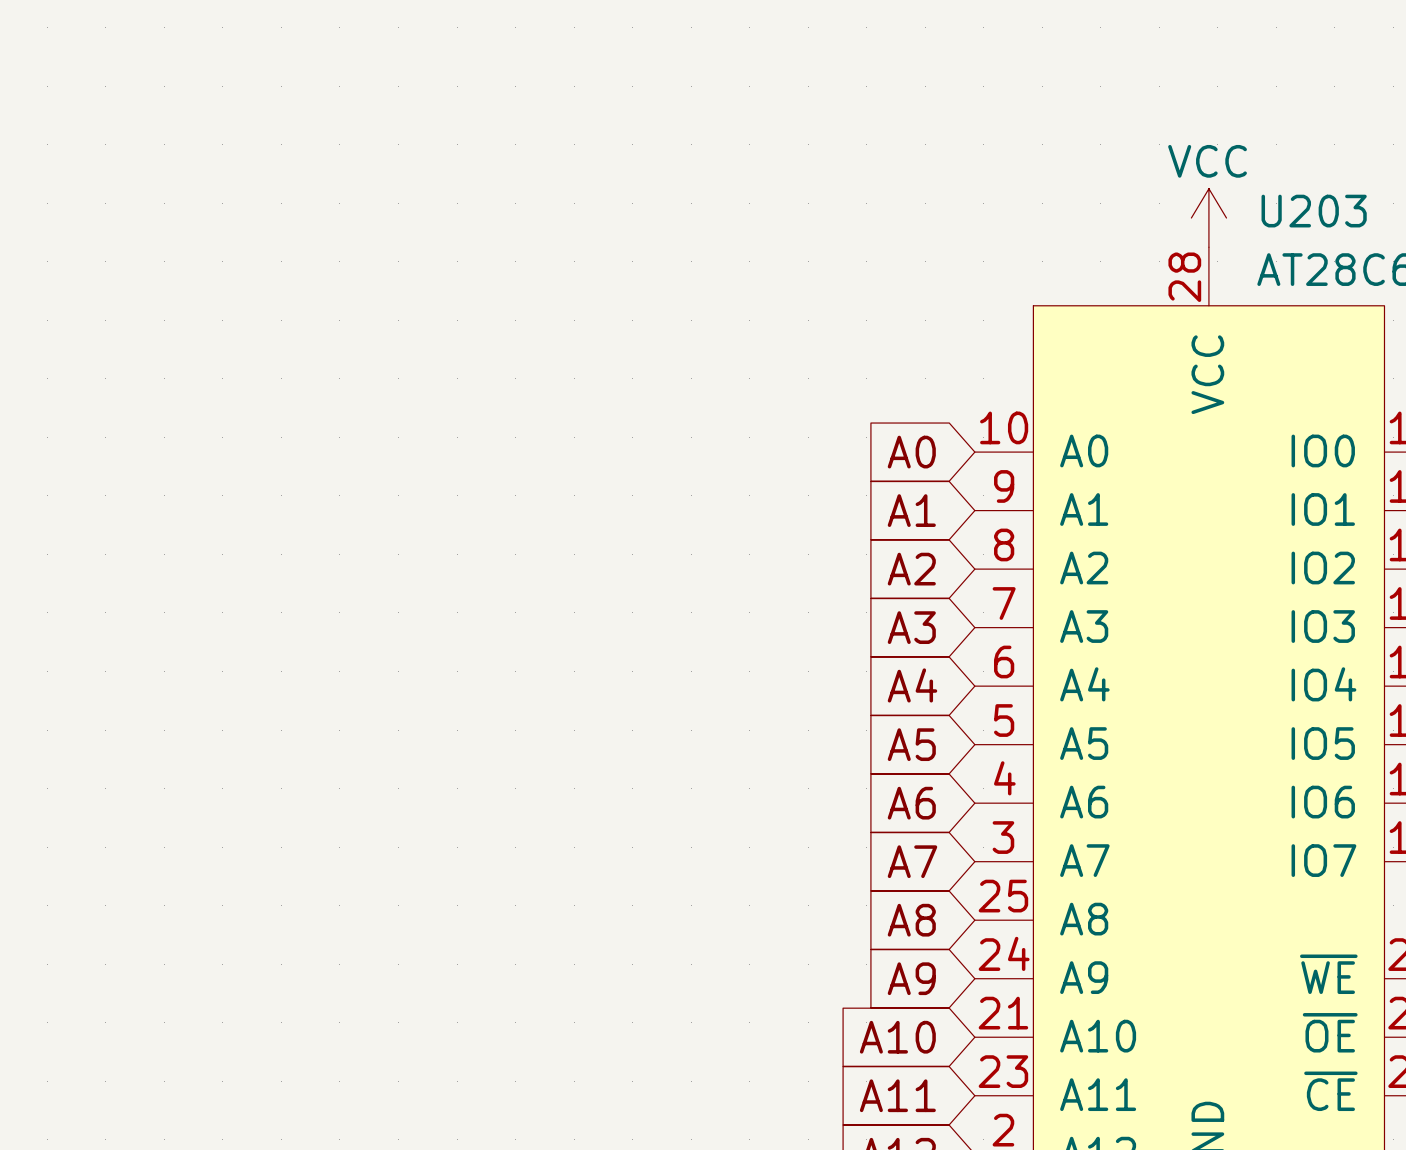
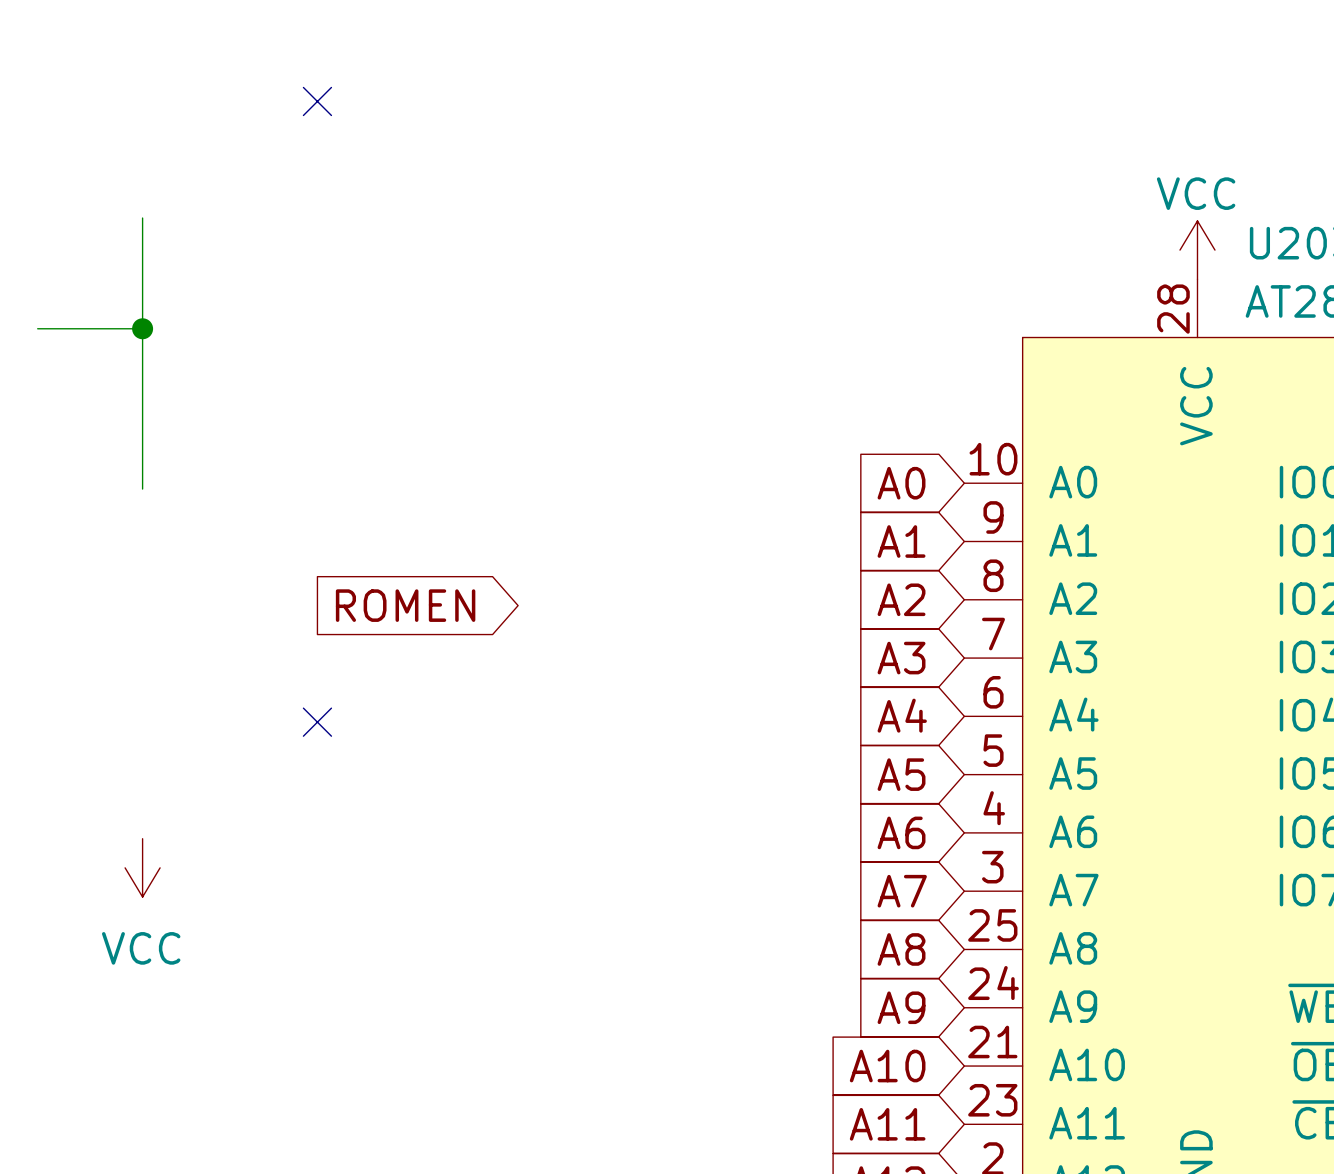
no-connect mark: none -> (317, 101)
wire: none -> (142, 218) (142, 489)
wire: none -> (37, 328) (142, 328)
junction: none -> (142, 328)
global label: none -> ROMEN (405, 605)
no-connect mark: none -> (317, 722)
power symbol: none -> VCC (142, 867)

